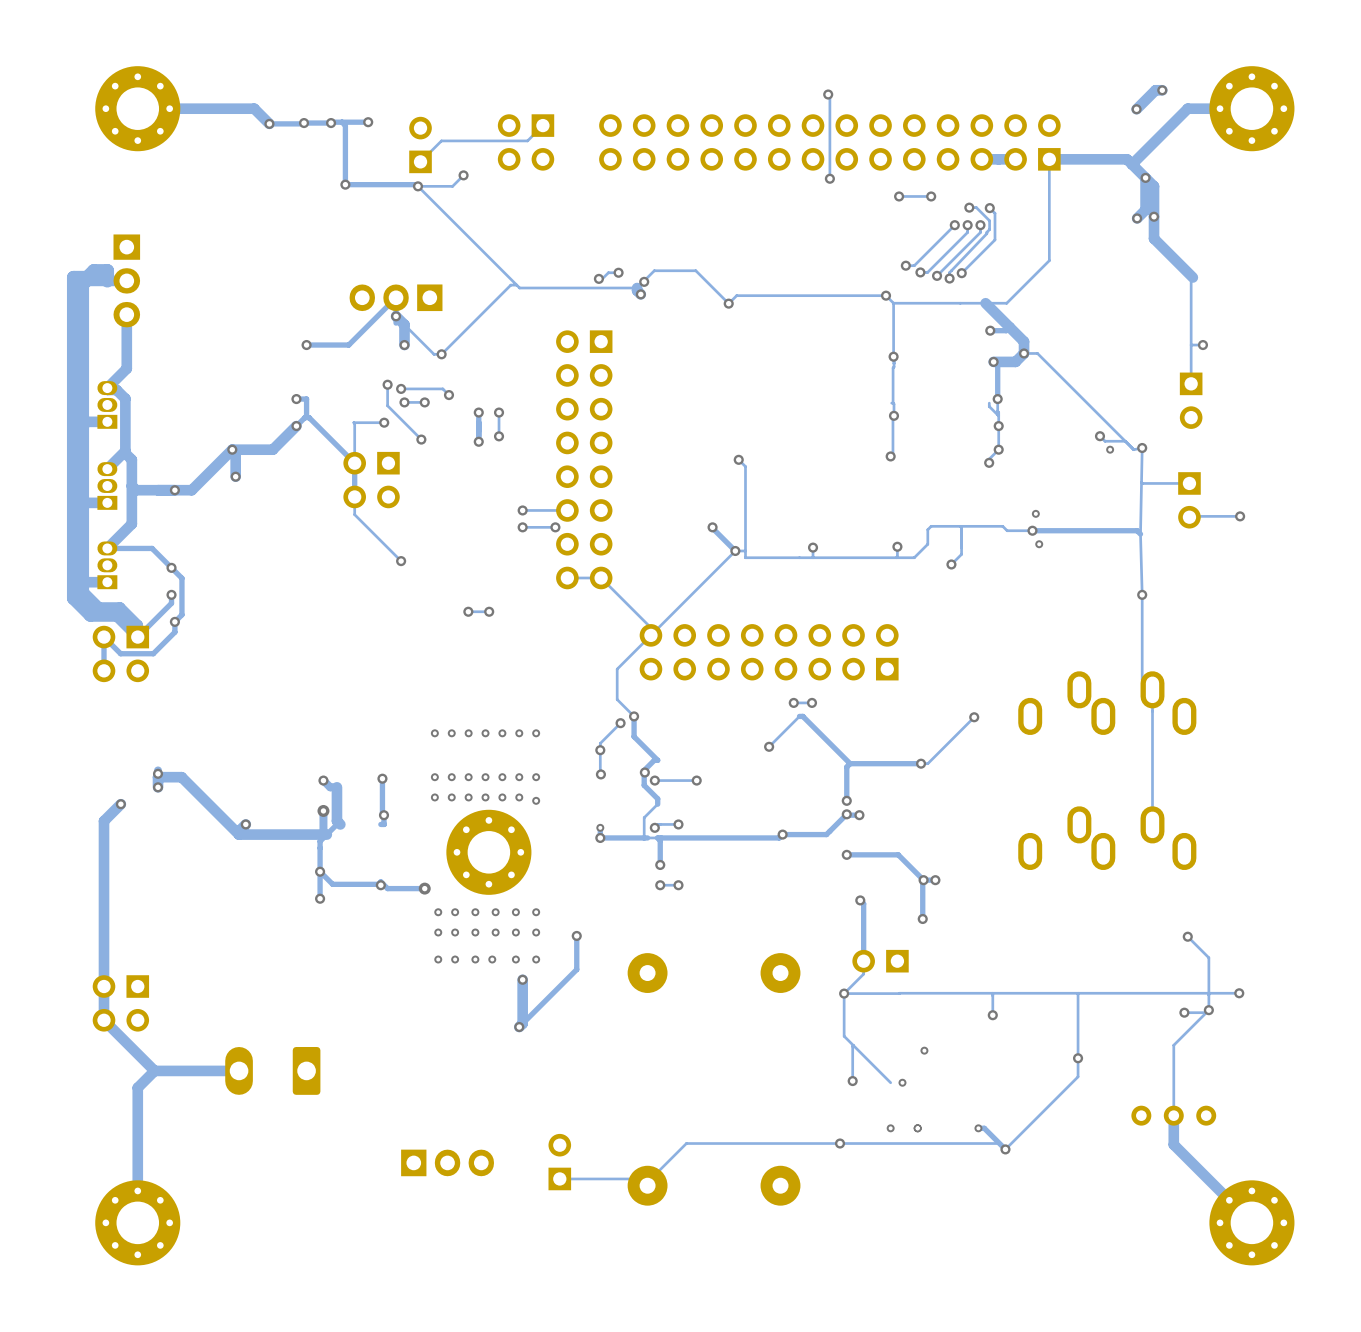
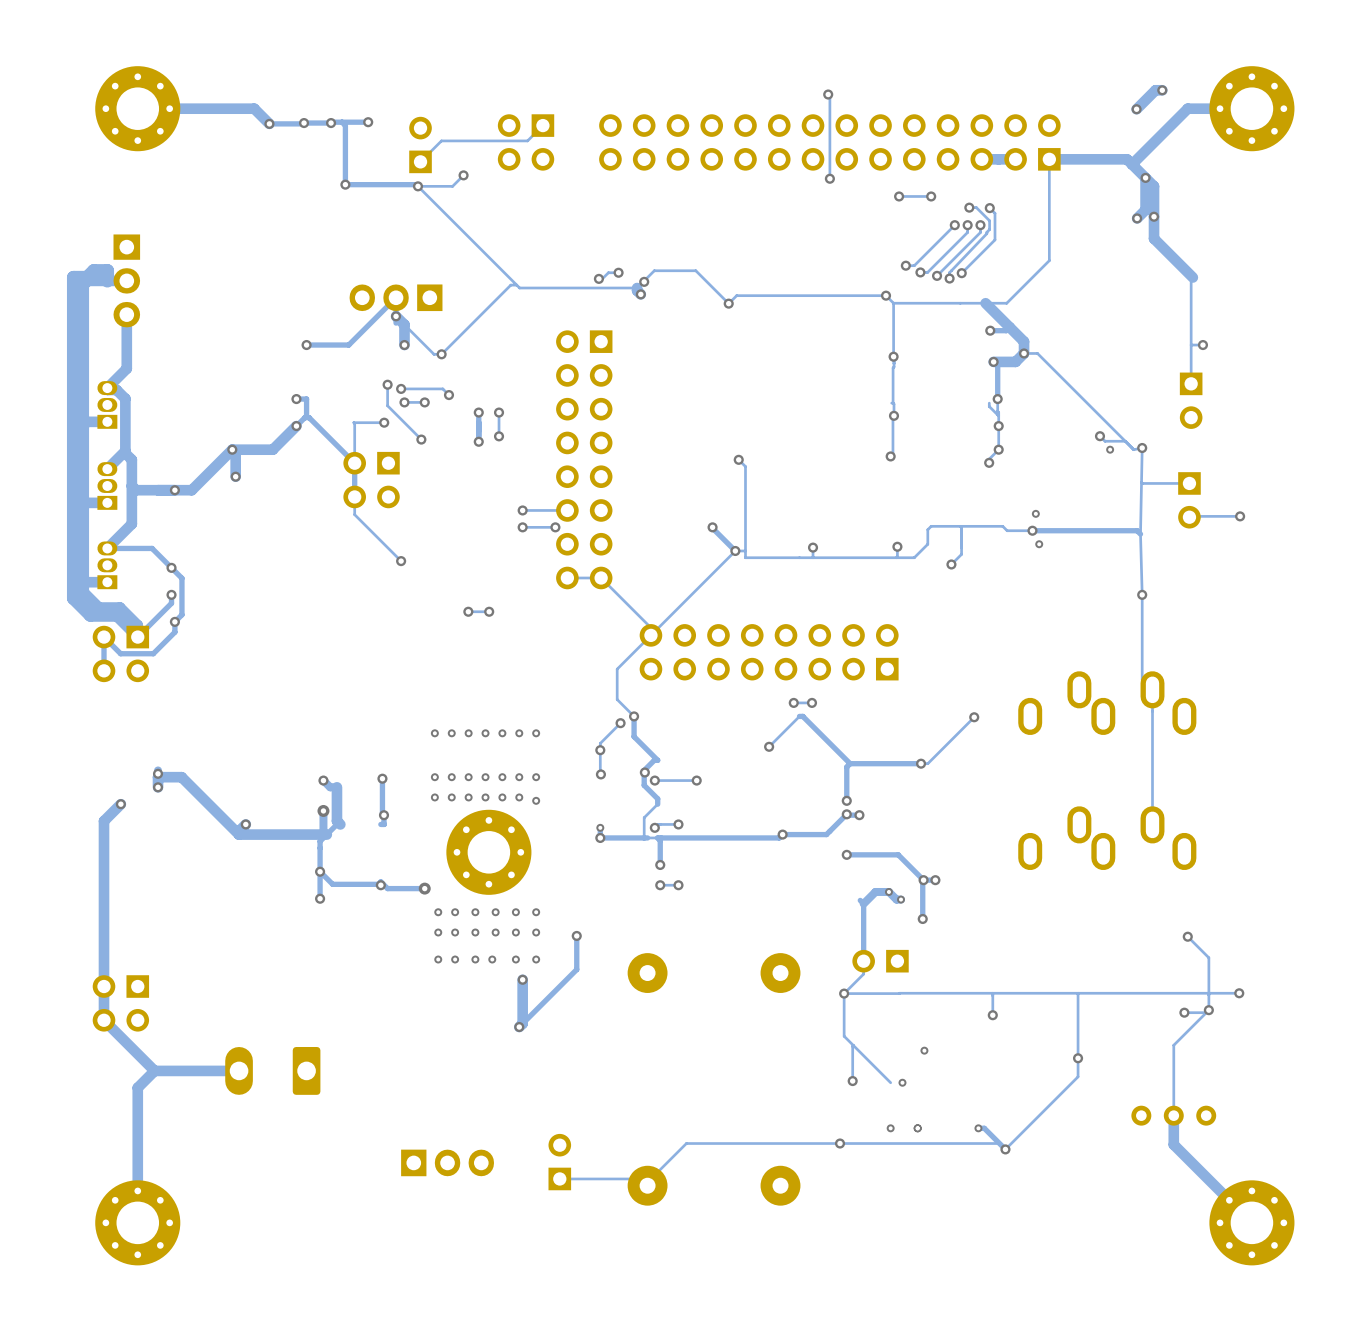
via: none -> (888, 891)
track: none -> (901, 899) (896, 899) (888, 891) (875, 891) (863, 903)
via: none -> (901, 899)
via: (860, 900) -> none

